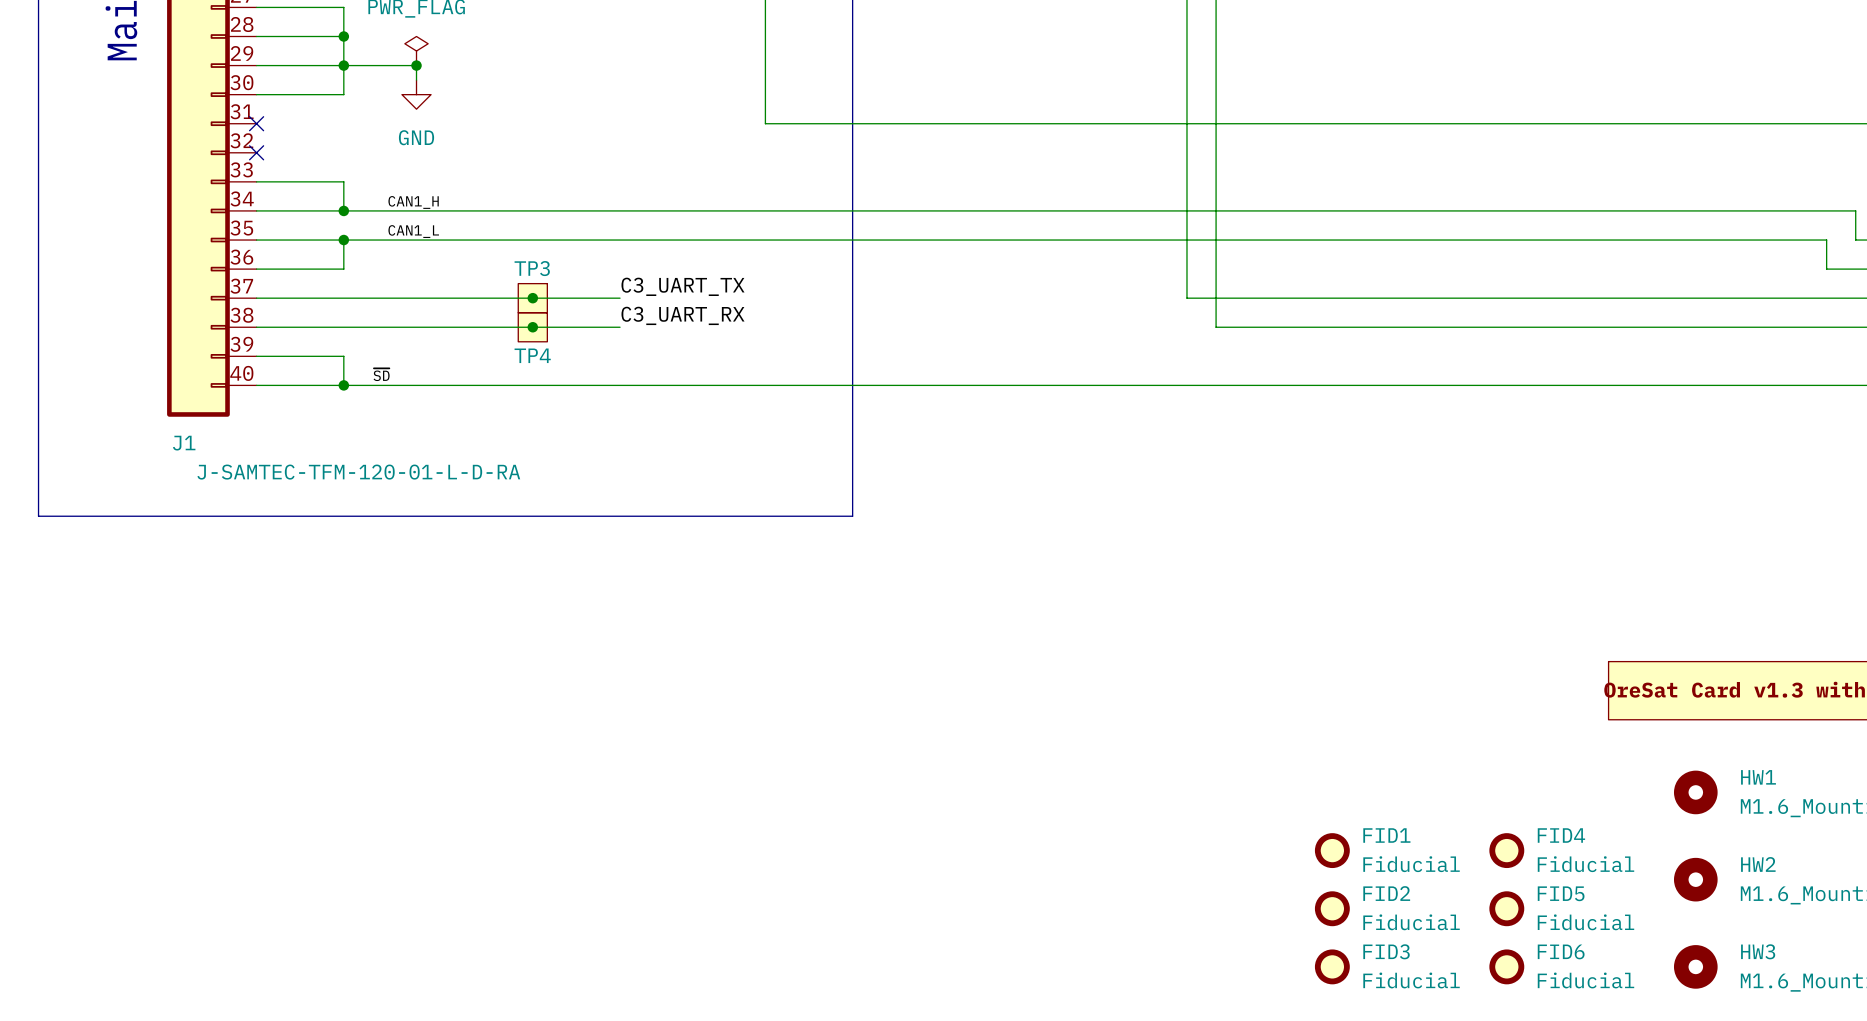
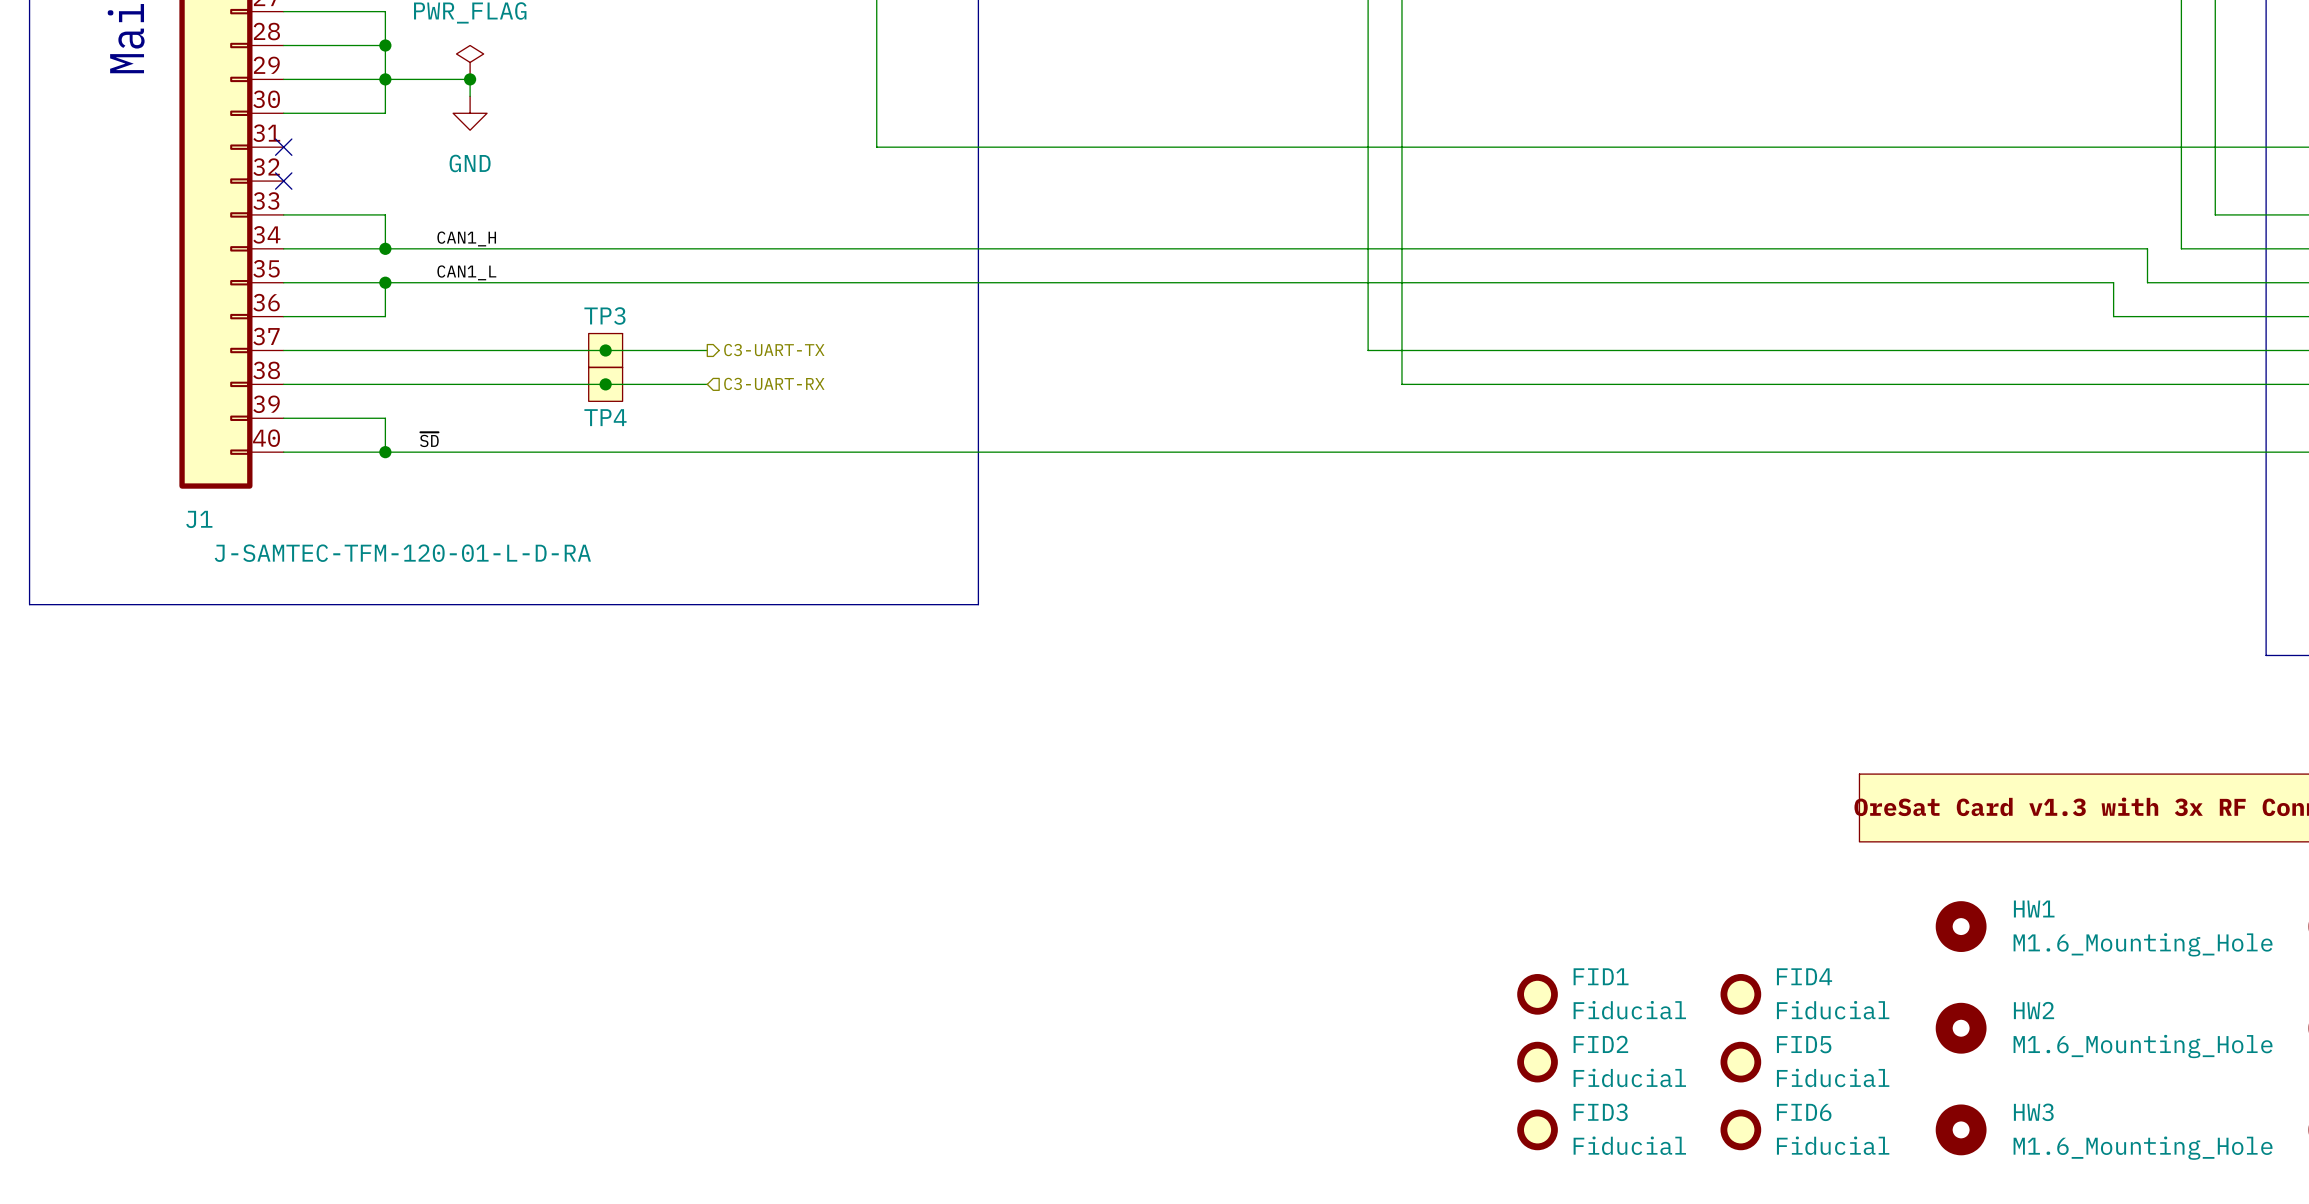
label: C3_UART_TX (682, 286) -> none
hierarchical label: none -> C3-UART-TX (774, 350)
label: C3_UART_RX (682, 315) -> none
hierarchical label: none -> C3-UART-RX (774, 383)

